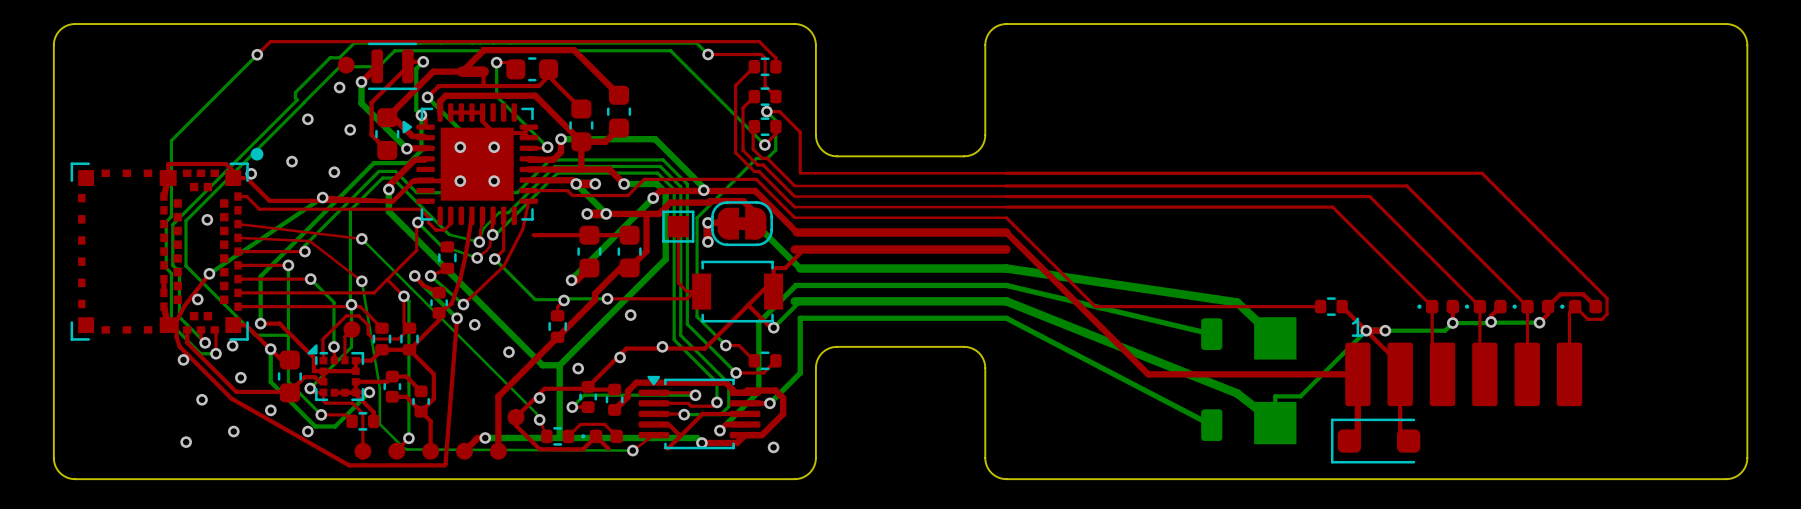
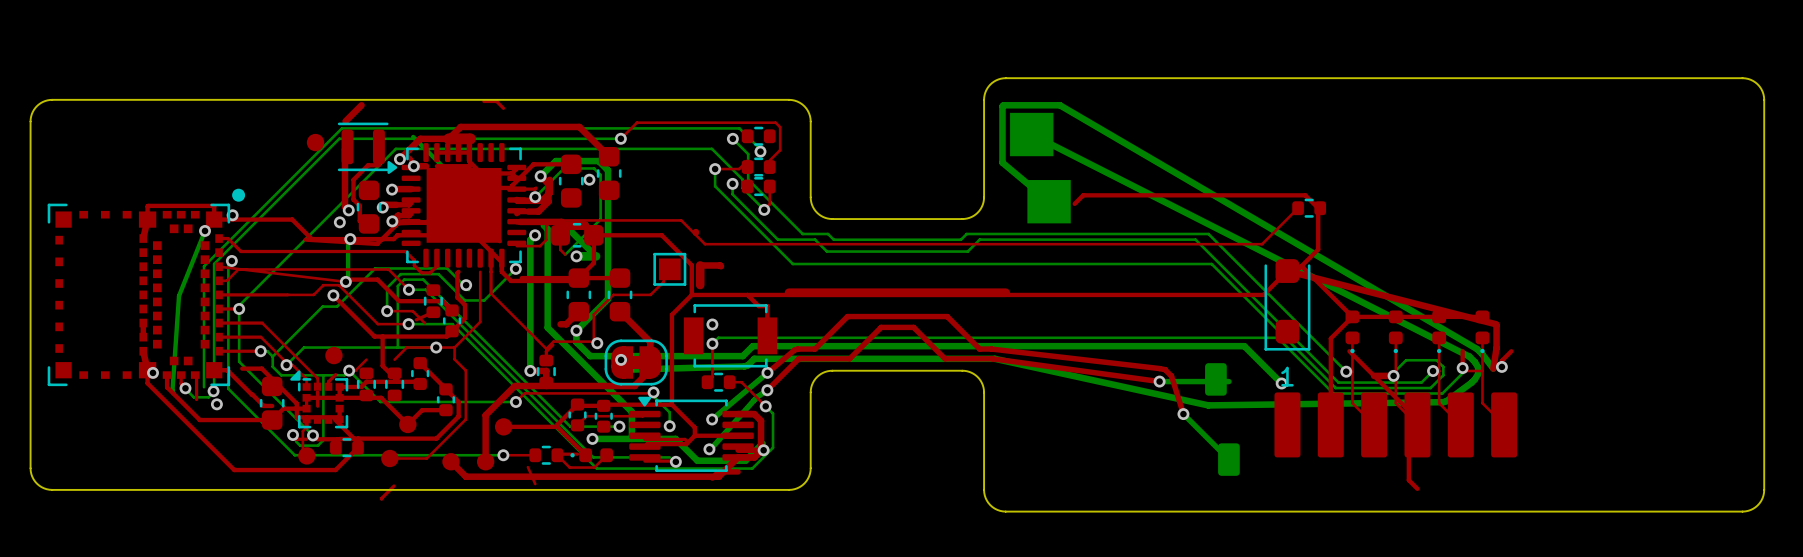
top track: (257, 54) (270, 41) (759, 41) (775, 58) (775, 66) -> none
bottom track: (257, 54) (171, 140) (171, 216) (166, 221) (166, 268) (171, 273) (171, 324) (200, 353) (216, 353) -> none
via: (257, 54) -> none
top track: (708, 54) (761, 54) (765, 58) (765, 85) (775, 96) -> none
bottom track: (708, 54) (696, 43) (354, 43) (339, 57) (330, 57) (295, 92) (297, 99) (172, 224) (172, 265) (179, 269) (179, 317) (205, 342) -> none
via: (708, 54) -> none
top track: (423, 61) (412, 61) (371, 102) (371, 134) (387, 150) -> none
bottom track: (423, 61) (416, 68) (416, 110) (421, 115) (421, 150) (408, 163) (373, 163) (260, 276) (260, 323) -> none
via: (423, 61) -> none
board edge: (985, 61) (985, 42) (988, 33) (995, 27) (1006, 24) (1726, 24) (1736, 26) (1744, 34) (1747, 42) (1747, 61) -> (984, 99) (986, 90) (990, 84) (998, 79) (1005, 78) (1742, 78) (1750, 79) (1757, 84) (1762, 91) (1764, 99)
bottom track: (496, 62) (496, 96) (547, 147) -> none
via: (496, 62) -> none
part position: (346, 65) -> (315, 142)
part position: (392, 66) -> (363, 146)
top track: (754, 66) (735, 85) (735, 152) (754, 171) (759, 171) (794, 207) (1332, 207) (1432, 306) (1432, 364) (1442, 374) -> none
part position: (765, 66) -> (758, 186)
part: (532, 69) -> none
part position: (472, 71) -> (459, 138)
top track: (483, 71) (483, 86) -> none
top track: (548, 76) (581, 109) -> none
top track: (548, 76) (538, 86) (438, 86) (427, 97) -> none
board edge: (53, 82) (55, 38) (63, 27) (75, 24) (797, 24) (809, 30) (815, 39) (815, 82) -> (30, 121) (31, 114) (36, 106) (45, 101) (52, 99) (789, 99) (797, 101) (804, 106) (809, 113) (810, 121)
bottom track: (361, 82) (361, 103) (406, 148) -> none
via: (361, 82) -> none
via: (339, 87) -> none
bottom track: none -> (1031, 134) (1469, 356) (1478, 367) (1478, 373) (1471, 382) (1443, 402) (1208, 405) (994, 358) (754, 358) (744, 366) (629, 369)
part: none -> (1031, 134)
top track: (619, 95) (573, 50) (483, 50) (462, 71) (433, 71) (387, 117) (393, 117) (412, 136) (425, 137) -> none
top track: (754, 96) (743, 107) (743, 150) (757, 165) (763, 165) (794, 196) (1369, 196) (1479, 306) (1479, 369) (1484, 374) -> none
via: (427, 97) -> none
top track: none -> (620, 138) (636, 122) (775, 122) (780, 127) (780, 150) (769, 160)
bottom track: none -> (620, 138) (339, 138) (214, 263) (214, 391) (208, 397) (193, 397) (184, 387)
via: none -> (620, 138)
bottom track: none -> (732, 138) (748, 154) (748, 179) (802, 234) (828, 233) (833, 239) (960, 239) (966, 233) (1208, 233) (1346, 371)
via: none -> (732, 138)
top track: none -> (347, 146) (344, 149) (344, 206) (348, 210)
bottom track: none -> (758, 147) (739, 128) (341, 128) (204, 266) (204, 387)
part position: (619, 111) -> (609, 173)
top track: (766, 111) (779, 111) (800, 132) (800, 173) (1482, 173) (1607, 298) (1607, 314) (1602, 319) (1587, 319) (1575, 306) (1569, 312) (1569, 374) -> none
bottom track: (766, 111) (775, 120) (775, 150) (767, 158) (756, 158) (697, 217) (697, 316) (725, 345) -> none
top track: (440, 112) (440, 101) (445, 95) (535, 95) (581, 141) -> none
via: (421, 115) -> none
top track: none -> (609, 156) (579, 126) (460, 126) (448, 138) (420, 138) (399, 159)
via: (307, 119) -> none
via: none -> (399, 159)
top track: none -> (747, 160) (739, 169) (715, 169)
top track: none -> (571, 164) (533, 164) (511, 187) (482, 187)
top track: none -> (378, 165) (368, 165) (353, 179) (353, 199) (359, 205) (359, 220) (366, 220) (369, 223)
top track: none -> (413, 166) (426, 166)
via: none -> (413, 166)
top track: none -> (436, 166) (469, 166) (469, 174) (482, 187)
part position: (581, 125) -> (571, 181)
top track: (754, 126) (753, 149) (762, 158) (767, 158) (794, 185) (1406, 185) (1527, 306) (1527, 374) -> none
top track: (775, 126) (775, 133) (764, 144) -> none
top track: (619, 128) (605, 141) (581, 141) -> none
bottom track: none -> (715, 169) (715, 186) (792, 264) (1211, 264) (1335, 388) (1430, 388) (1443, 375) (1443, 366) (1436, 360) (1406, 360) (1395, 371)
via: none -> (715, 169)
via: (350, 129) -> none
part position: (387, 134) -> (369, 207)
top track: none -> (540, 176) (548, 184) (548, 201) (538, 211) (518, 211) (516, 213)
via: none -> (540, 176)
board edge: (815, 135) (818, 144) (822, 150) (827, 154) (837, 156) (966, 156) (973, 154) (980, 148) (985, 135) -> (810, 175) (810, 199) (812, 206) (820, 215) (832, 219) (967, 218) (975, 214) (982, 204) (984, 175)
bottom track: (561, 139) (655, 139) (703, 187) (703, 190) -> none
via: (561, 139) -> none
via: none -> (589, 179)
top track: (581, 141) (581, 169) -> none
bottom track: none -> (732, 183) (732, 194) (777, 239) (815, 239) (826, 251) (967, 251) (979, 239) (1195, 239) (1338, 382) (1421, 382) (1433, 371)
via: none -> (732, 183)
bottom track: (764, 144) (670, 50) (394, 50) (378, 66) (339, 66) (186, 220) (186, 265) (255, 335) (288, 335) -> none
via: (764, 144) -> none
top track: none -> (769, 186) (769, 204) (764, 209)
via: (460, 147) -> none
via: (494, 147) -> none
via: (547, 147) -> none
bottom track: none -> (535, 197) (563, 168) (594, 168) (600, 175) (600, 219) (565, 254)
via: none -> (535, 197)
top track: (425, 158) (414, 160) (388, 185) (388, 189) -> none
bottom track: none -> (1049, 201) (1002, 162) (1003, 105) (1059, 105) (1477, 349) (1493, 368)
part: none -> (1049, 201)
via: (291, 161) -> none
top track: none -> (411, 202) (409, 204) (385, 204) (382, 207)
top track: none -> (1074, 203) (1083, 195) (1305, 195) (1318, 208)
top track: (168, 165) (225, 164) (239, 178) -> (147, 206) (213, 205) (214, 219) (205, 230)
via: none -> (382, 207)
top track: none -> (1298, 208) (1262, 244) (705, 244) (681, 220) (551, 220) (546, 225) (546, 239) (540, 246) (516, 246)
top track: none -> (1318, 208) (1318, 249) (1299, 268) (1290, 268) (1263, 294) (691, 294)
bottom track: none -> (764, 209) (742, 188) (742, 179) (711, 148) (395, 148) (239, 305) (239, 361) (312, 435)
via: none -> (764, 209)
via: none -> (348, 210)
top track: (528, 169) (609, 169) (624, 184) -> none
via: (334, 172) -> none
top track: none -> (411, 213) (409, 215) (398, 215) (392, 221)
top track: (246, 178) (269, 200) (393, 200) -> (228, 219) (292, 219) (311, 239) (393, 239) (397, 235) (474, 235) (501, 262) (501, 271) (511, 280) (575, 280) (593, 263) (593, 235) (661, 235) (691, 265) (691, 294)
via: none -> (392, 221)
via: none -> (339, 222)
via: (460, 181) -> none
via: (494, 181) -> none
bottom track: none -> (543, 225) (547, 229) (547, 327) (631, 411) (631, 438)
via: (576, 183) -> none
via: (595, 183) -> none
bottom track: (624, 184) (656, 184) (665, 192) (665, 259) (559, 365) -> none
via: (624, 184) -> none
bottom track: none -> (205, 230) (179, 295) (173, 393)
via: none -> (205, 230)
bottom track: (388, 189) (388, 211) (542, 365) (559, 365) -> none
via: (388, 189) -> none
top track: (528, 190) (567, 190) (572, 195) (628, 195) (644, 179) (756, 179) (794, 217) (1006, 217) (1095, 306) (1320, 306) -> none
via: (703, 190) -> none
bottom track: none -> (535, 235) (530, 240) (530, 370)
via: none -> (535, 235)
top track: none -> (560, 235) (560, 249) (565, 254)
part: none -> (577, 235)
bottom track: (322, 197) (209, 273) -> none
via: (322, 197) -> none
bottom track: none -> (350, 239) (348, 241) (348, 279)
via: none -> (350, 239)
top track: (653, 198) (660, 190) (755, 190) (796, 232) (1006, 232) (1148, 374) (1357, 374) (1357, 432) (1349, 441) -> none
bottom track: (653, 198) (571, 280) -> none
via: (653, 198) -> none
top track: (528, 201) (522, 229) (503, 266) (463, 304) -> none
top track: (587, 213) (659, 213) (670, 202) (743, 201) (755, 213) (755, 223) -> none
via: (606, 213) -> none
top track: (646, 213) (646, 251) (629, 267) (620, 267) (595, 293) (595, 299) (498, 396) -> (620, 311) (650, 342) (650, 370) (634, 386) (514, 386) (485, 415) (485, 443)
top track: (471, 215) (460, 279) (451, 303) (439, 312) (439, 320) (409, 349) -> none
top track: (482, 215) (479, 242) -> none
bottom track: none -> (231, 260) (228, 264) (228, 388) (294, 455) (503, 455)
via: none -> (231, 260)
via: (207, 219) -> none
top track: (417, 222) (416, 250) (374, 292) (278, 292) -> (306, 386) (306, 379) (292, 365) (286, 365) (286, 362) (260, 337)
bottom track: (417, 222) (440, 245) (477, 257) -> none
via: (417, 222) -> none
via: (707, 222) -> none
part position: (742, 223) -> (636, 362)
top track: none -> (1301, 266) (1352, 316)
bottom track: none -> (515, 268) (484, 300) (464, 300) (438, 274) (400, 274) (387, 287) (387, 311)
via: none -> (515, 268)
top track: (678, 226) (678, 282) (687, 291) (701, 291) -> none
top track: none -> (1287, 271) (1495, 324) (1496, 347) (1493, 368)
top track: none -> (458, 271) (457, 297) (464, 305) (464, 318) (446, 336) (374, 336) (333, 295)
top track: none -> (480, 271) (480, 321) (454, 347)
top track: (492, 234) (493, 215) (489, 246) (477, 257) -> none
via: (492, 234) -> none
bottom track: (495, 234) (557, 173) (657, 173) (674, 189) (674, 339) (716, 382) (716, 402) -> none
top track: none -> (348, 279) (377, 279) (399, 301) (442, 301) (452, 310)
top track: (238, 237) (311, 242) (361, 281) -> (219, 280) (227, 280) (238, 269) (388, 269) (408, 289)
bottom track: (361, 238) (536, 413) (539, 419) -> none
bottom track: (707, 241) (707, 222) (754, 222) (800, 268) (1006, 268) (1237, 302) (1275, 338) -> (540, 176) (555, 161) (598, 161) (608, 170) (608, 299) (576, 330) (576, 342) (590, 356) (742, 356) (752, 346) (1244, 346) (1281, 383)
via: (707, 241) -> none
bottom track: none -> (408, 289) (425, 289) (593, 457) (669, 457)
via: none -> (408, 289)
bottom track: none -> (468, 290) (447, 268) (375, 268) (337, 306) (322, 306) (272, 356)
top track: (803, 249) (785, 268) (773, 268) -> (747, 294) (758, 306) (767, 306) (767, 311)
top track: (503, 250) (494, 259) -> (491, 293) (546, 348) (553, 341) (593, 341) (593, 314) (613, 294) (650, 294) (663, 281) (663, 266)
top track: none -> (287, 294) (313, 294) (323, 285) (338, 285) (377, 324) (408, 324)
bottom track: (304, 251) (304, 245) (379, 171) (395, 171) (416, 192) (517, 192) (550, 159) (663, 159) (687, 184) (687, 324) (736, 372) -> none
via: (304, 251) -> none
top track: none -> (691, 294) (671, 314) (671, 404)
via: none -> (333, 295)
via: (477, 257) -> none
bottom track: (494, 259) (535, 299) (564, 299) -> none
via: (494, 259) -> none
top track: (257, 265) (288, 265) -> (503, 455) (535, 455)
via: none -> (239, 308)
bottom track: (288, 265) (288, 381) (321, 414) -> none
via: (288, 265) -> none
top track: none -> (387, 311) (412, 311) (424, 323)
via: none -> (387, 311)
top track: (209, 273) (184, 306) (176, 321) (176, 337) (179, 346) (231, 398) (349, 465) (445, 464) (457, 318) -> none
via: (209, 273) -> none
top track: none -> (1352, 316) (1482, 316)
top track: none -> (1352, 316) (1330, 338) (1330, 424)
top track: (414, 275) (423, 285) (439, 292) -> none
bottom track: (414, 275) (457, 318) -> none
via: (414, 275) -> none
bottom track: (430, 275) (463, 304) -> none
via: (430, 275) -> none
part: none -> (452, 320)
top track: (280, 279) (310, 279) -> (262, 323) (317, 378) (317, 386)
bottom track: (310, 279) (333, 302) (333, 346) -> none
via: (310, 279) -> none
top track: (387, 279) (403, 296) (403, 322) (409, 328) (398, 339) (373, 339) (368, 333) (368, 325) (358, 315) (346, 315) (322, 339) (323, 351) -> (445, 410) (422, 410) (407, 424) (381, 397) (306, 397)
top track: (773, 279) (704, 348) (626, 348) (588, 386) (590, 388) -> none
bottom track: none -> (408, 324) (452, 324) (596, 468) (752, 468) (773, 447) (773, 413) (765, 406)
via: none -> (408, 324)
via: (571, 280) -> none
via: none -> (712, 324)
bottom track: (361, 281) (379, 388) (379, 424) (404, 448) (632, 450) -> none
via: (361, 281) -> none
via: none -> (576, 330)
part: none -> (1352, 331)
part: none -> (1395, 331)
part: none -> (1439, 331)
part: none -> (1482, 331)
top track: (694, 291) (687, 298) (607, 298) -> none
top track: none -> (382, 336) (382, 365) (398, 381)
top track: none -> (1352, 337) (1352, 403) (1374, 424)
top track: none -> (1395, 337) (1395, 403) (1417, 424)
top track: none -> (1439, 337) (1439, 403) (1460, 424)
top track: none -> (1482, 337) (1482, 403) (1504, 424)
bottom track: (403, 296) (408, 301) (408, 438) -> none
via: (403, 296) -> none
bottom track: (607, 298) (564, 299) -> none
via: (197, 299) -> none
top track: none -> (712, 343) (712, 377) (707, 382)
bottom track: none -> (712, 343) (718, 337) (1277, 337) (1333, 393) (1442, 393) (1464, 370)
via: none -> (712, 343)
via: (564, 300) -> none
bottom track: (794, 301) (1006, 301) (1237, 393) (1275, 423) (1275, 396) (1300, 396) (1366, 330) -> none
bottom track: (800, 301) (773, 327) -> none
part: (439, 302) -> none
bottom track: none -> (397, 347) (397, 286) (404, 279) (423, 279) (570, 426) (619, 426)
bottom track: none -> (436, 347) (304, 347) (286, 365)
via: none -> (436, 347)
top track: none -> (454, 347) (406, 347) (394, 359)
top track: none -> (454, 347) (454, 359) (465, 370) (465, 419) (426, 458) (389, 458)
via: (351, 304) -> none
via: (463, 304) -> none
top track: (748, 305) (770, 327) (773, 327) -> none
top track: (278, 306) (360, 306) (381, 328) -> none
bottom track: none -> (260, 351) (267, 351) (272, 356)
via: none -> (260, 351)
part position: (1331, 306) -> (1309, 208)
part: (1438, 306) -> none
part: (1485, 306) -> none
part: (1533, 306) -> none
part: (1581, 306) -> none
top track: (1595, 306) (1583, 294) (1560, 294) (1548, 306) (1548, 314) (1539, 322) -> none
bottom track: none -> (272, 356) (272, 366) (281, 375) (344, 375) (349, 370) (380, 401) (515, 401)
top track: none -> (366, 359) (355, 370) (349, 370)
top track: none -> (420, 363) (445, 388)
via: (457, 318) -> none
via: none -> (286, 365)
bottom track: (1539, 322) (1452, 323) (1445, 330) (1366, 330) -> none
via: (1539, 322) -> none
via: (260, 323) -> none
via: (474, 324) -> none
via: none -> (349, 370)
top track: none -> (530, 370) (546, 370) (546, 386)
via: none -> (530, 370)
via: none -> (1433, 371)
top track: none -> (1464, 370) (1482, 370)
top track: none -> (153, 372) (147, 370) (147, 383) (234, 470) (335, 470) (358, 447) (358, 438)
via: none -> (153, 372)
part: none -> (420, 373)
top track: none -> (766, 373) (794, 350) (815, 349) (847, 316) (947, 316) (979, 349) (1165, 369) (1171, 376) (1183, 414)
bottom track: none -> (766, 373) (712, 419)
part position: (351, 329) -> (333, 355)
bottom track: none -> (323, 375) (323, 440) (317, 445) (300, 445) (296, 441)
via position: (1366, 330) -> (1346, 371)
bottom track: (1211, 334) (1006, 285) (795, 285) (758, 322) (758, 391) (719, 430) -> none
top track: none -> (729, 382) (741, 382) (765, 406)
top track: none -> (1159, 381) (992, 358) (945, 358) (913, 327) (881, 327) (849, 358) (798, 358) (767, 390)
bottom track: none -> (1159, 381) (1228, 381)
via: none -> (1159, 381)
top track: none -> (420, 383) (418, 381) (366, 381) (361, 386) (339, 386) (339, 397)
part: (1275, 338) -> none
via: none -> (1281, 383)
top track: (187, 341) (236, 391) (289, 391) -> (167, 387) (199, 420) (272, 420) (283, 408) (306, 408) (306, 406)
top track: (344, 341) (344, 360) -> none
top track: none -> (445, 389) (458, 402) (458, 416) (436, 438) (353, 438) (335, 419)
bottom track: none -> (767, 390) (754, 399) (712, 447)
via: none -> (767, 390)
top track: (725, 345) (739, 345) (754, 360) -> none
via: (725, 345) -> none
via: (333, 346) -> none
top track: none -> (650, 393) (524, 393) (515, 401)
bottom track: none -> (650, 393) (669, 412) (669, 426)
bottom track: (270, 349) (270, 381) (315, 426) (335, 426) (369, 392) -> none
via: (270, 349) -> none
top track: (409, 349) (433, 374) (433, 398) (421, 411) -> none
top track: (409, 349) (381, 349) (371, 360) (355, 360) (355, 362) -> none
via position: (508, 352) -> (515, 401)
via: (216, 353) -> none
part: none -> (445, 399)
via: (620, 357) -> none
via: none -> (216, 404)
top track: none -> (671, 404) (577, 404) (557, 426)
top track: none -> (671, 404) (694, 427) (694, 435)
via: (183, 359) -> none
part position: (765, 360) -> (718, 382)
via: none -> (765, 406)
top track: (775, 360) (763, 372) (736, 372) -> none
bottom track: (559, 365) (559, 438) -> none
via: (578, 368) -> none
part: none -> (577, 414)
top track: none -> (644, 414) (642, 416) (586, 416) (577, 425)
top track: none -> (738, 414) (754, 414) (761, 420) (761, 451) (754, 457) (738, 457) (718, 476) (465, 476) (450, 461)
board edge: (815, 368) (818, 358) (822, 353) (827, 348) (837, 346) (966, 346) (979, 353) (983, 358) (985, 368) -> (810, 414) (810, 389) (812, 383) (820, 374) (832, 370) (967, 371) (975, 375) (982, 385) (984, 414)
bottom track: none -> (1183, 414) (1228, 459)
via: none -> (1183, 414)
part: none -> (603, 416)
part position: (335, 372) -> (319, 399)
via: (736, 372) -> none
via: none -> (712, 419)
part position: (1463, 374) -> (1395, 424)
part position: (289, 376) -> (272, 403)
via: (240, 377) -> none
part: none -> (407, 424)
via: none -> (669, 426)
top track: none -> (503, 426) (557, 426)
part: none -> (503, 426)
top track: none -> (557, 426) (585, 455)
via: none -> (619, 426)
top track: (323, 381) (319, 381) (314, 377) (304, 377) (289, 391) -> (306, 427) (302, 431) (302, 451) (306, 455)
part: (392, 386) -> none
bottom track: (310, 388) (351, 347) (350, 210) (382, 178) (392, 178) (449, 234) (479, 242) (484, 227) (499, 212) (508, 212) (554, 166) (660, 166) (680, 186) (680, 335) (728, 383) (728, 406) (720, 414) (684, 414) -> none
via: none -> (312, 435)
top track: (614, 389) (544, 388) (515, 417) (515, 425) (539, 449) (583, 449) (596, 436) (608, 448) -> none
top track: none -> (694, 435) (738, 435)
top track: none -> (694, 435) (686, 444) (647, 444) (644, 446)
top track: (421, 391) (406, 376) (392, 376) (387, 381) (355, 381) (354, 393) (373, 412) (373, 421) -> none
top track: (323, 392) (323, 401) (325, 403) (352, 403) (362, 413) (362, 451) -> none
via: (369, 392) -> none
bottom track: none -> (592, 438) (675, 438) (697, 460) (745, 460) (762, 443)
via: none -> (592, 438)
bottom track: (695, 395) (584, 395) (572, 407) -> none
via: (695, 395) -> none
top track: (392, 396) (406, 396) (430, 421) (430, 451) -> none
via: (539, 397) -> none
part: (588, 397) -> none
via: (202, 399) -> none
part: (614, 399) -> none
part: (421, 401) -> none
top track: (716, 402) (713, 406) (691, 406) (688, 403) (653, 403) -> none
bottom track: (769, 403) (800, 373) (800, 318) (1006, 318) (1211, 425) -> none
via: (572, 407) -> none
part: none -> (306, 455)
via: none -> (503, 455)
top track: none -> (557, 455) (569, 467) (594, 467) (606, 455)
top track: (614, 409) (627, 396) (627, 391) (636, 382) (725, 382) (735, 392) (745, 392) (747, 390) (775, 390) (783, 398) (783, 413) (762, 435) (745, 435) (737, 442) (701, 442) -> none
via: (270, 410) -> none
part: none -> (389, 458)
part position: (699, 412) -> (691, 434)
top track: (745, 413) (702, 413) (667, 448) -> none
top track: (321, 414) (345, 414) (352, 421) -> none
via: (321, 414) -> none
part: none -> (450, 461)
top track: (498, 414) (498, 451) -> none
part position: (515, 417) -> (485, 461)
via: (539, 419) -> none
board edge: (53, 420) (55, 466) (62, 474) (75, 479) (797, 478) (809, 472) (815, 463) (815, 420) -> (30, 468) (32, 476) (36, 483) (43, 488) (52, 489) (789, 489) (797, 488) (804, 483) (809, 476) (810, 468)
part position: (362, 421) -> (346, 447)
part: (1275, 423) -> none
top track: (668, 424) (680, 436) -> none
part position: (1211, 425) -> (1228, 459)
via: (719, 430) -> none
via: (233, 431) -> none
via: (307, 431) -> none
top track: (653, 435) (632, 450) -> none
part position: (557, 436) -> (546, 455)
top track: (568, 436) (580, 424) (604, 424) (616, 436) -> none
part position: (602, 436) -> (591, 455)
via: (408, 438) -> none
top track: (485, 438) (477, 438) (464, 451) -> none
bottom track: (485, 438) (696, 438) (701, 442) -> none
via: (485, 438) -> none
part rotation: 0° (1375, 441) -> 90° counterclockwise (1287, 304)
part position: (1375, 441) -> (1287, 304)
via: (186, 442) -> none
via: (701, 442) -> none
board edge: (985, 442) (985, 460) (988, 468) (995, 476) (1006, 479) (1726, 479) (1736, 476) (1744, 468) (1747, 460) (1747, 442) -> (984, 489) (985, 498) (990, 505) (997, 509) (1005, 511) (1742, 511) (1750, 509) (1757, 505) (1762, 498) (1764, 489)
via: (773, 447) -> none
via: (632, 450) -> none
part: (362, 451) -> none
part: (396, 451) -> none
part: (430, 451) -> none
part: (464, 451) -> none
part: (498, 451) -> none

